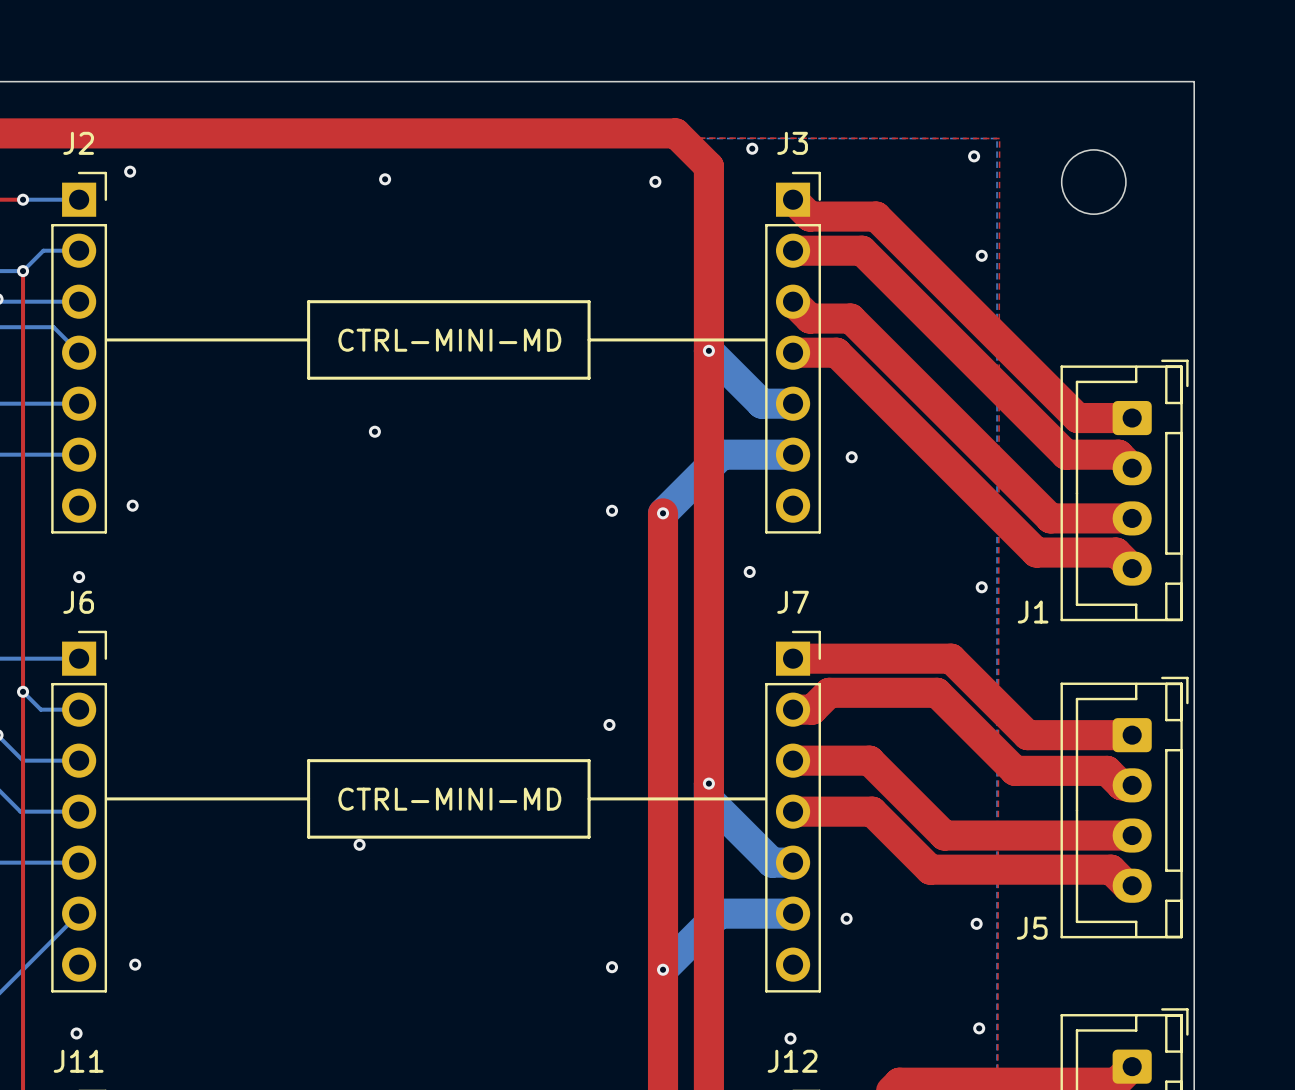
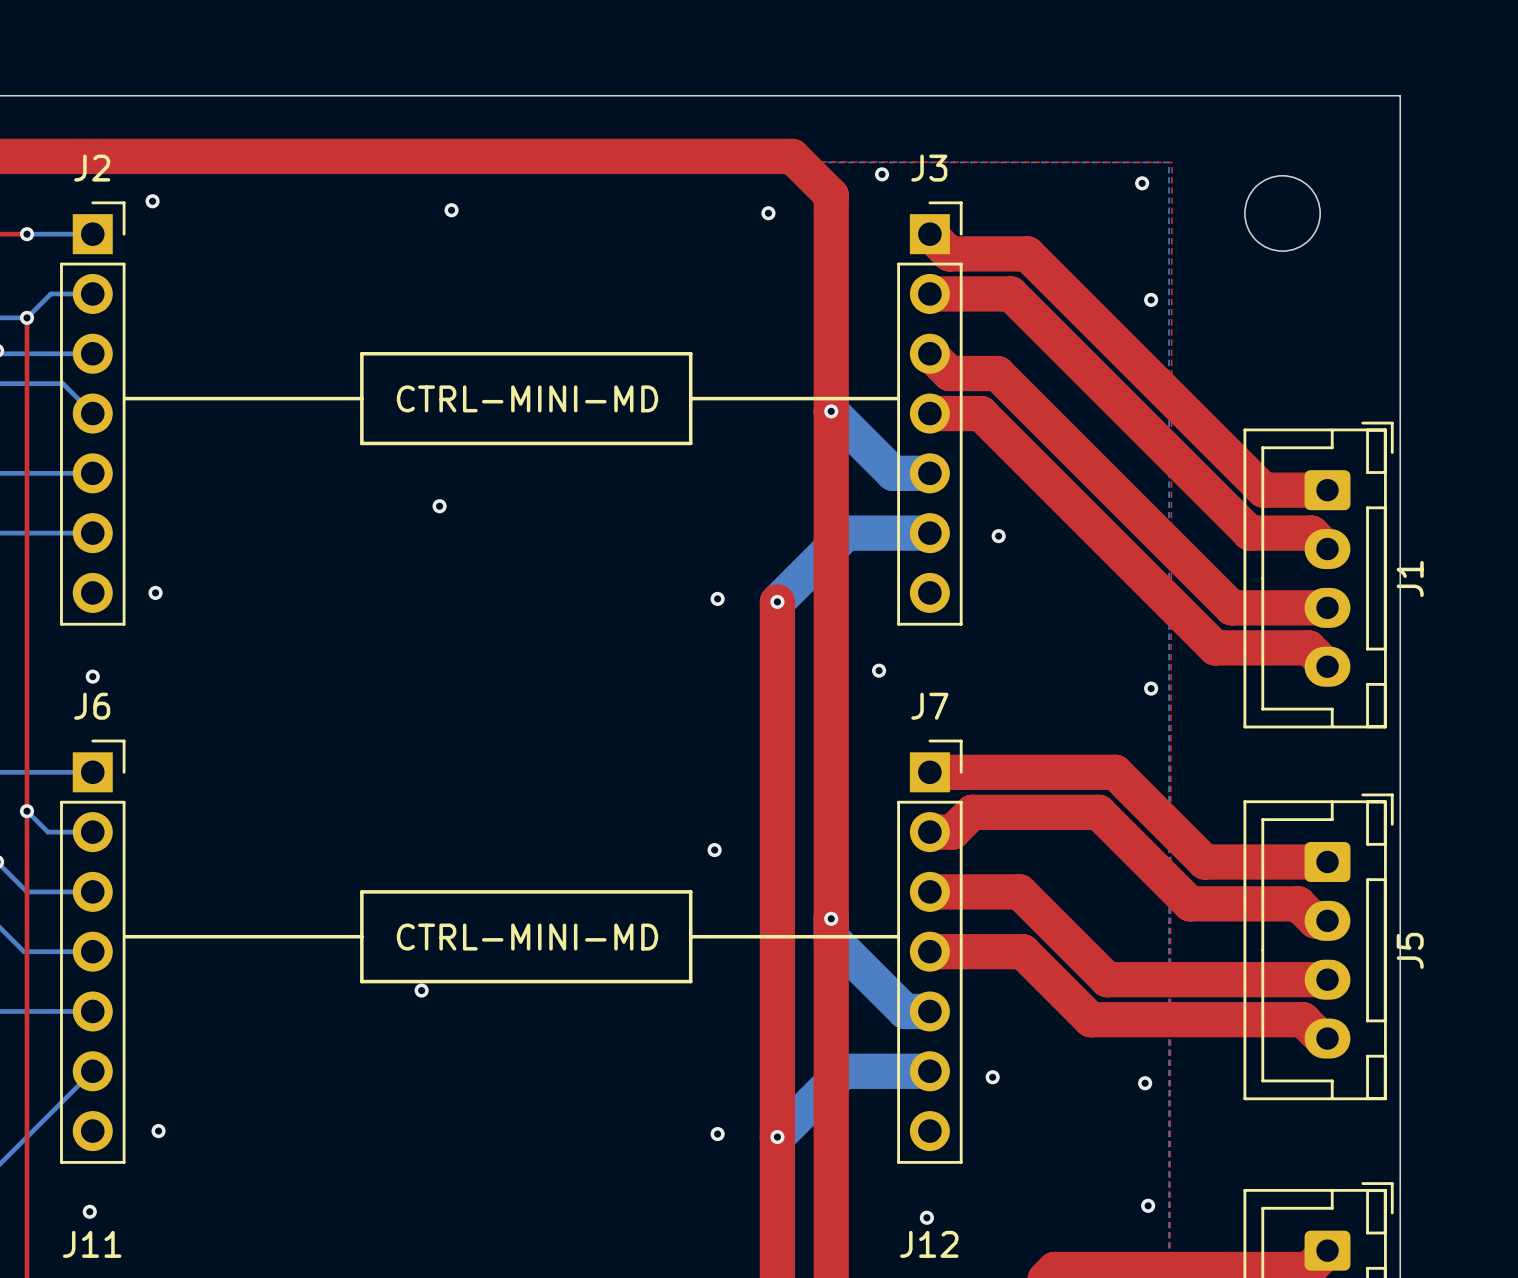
J1 name rotation: 0° (1033, 612) -> 90° counterclockwise (1410, 579)
J1 name position: J1 (1033, 612) -> J1 (1410, 579)
J5 name rotation: 0° (1032, 928) -> 90° counterclockwise (1410, 950)
J5 name position: J5 (1032, 928) -> J5 (1410, 950)

